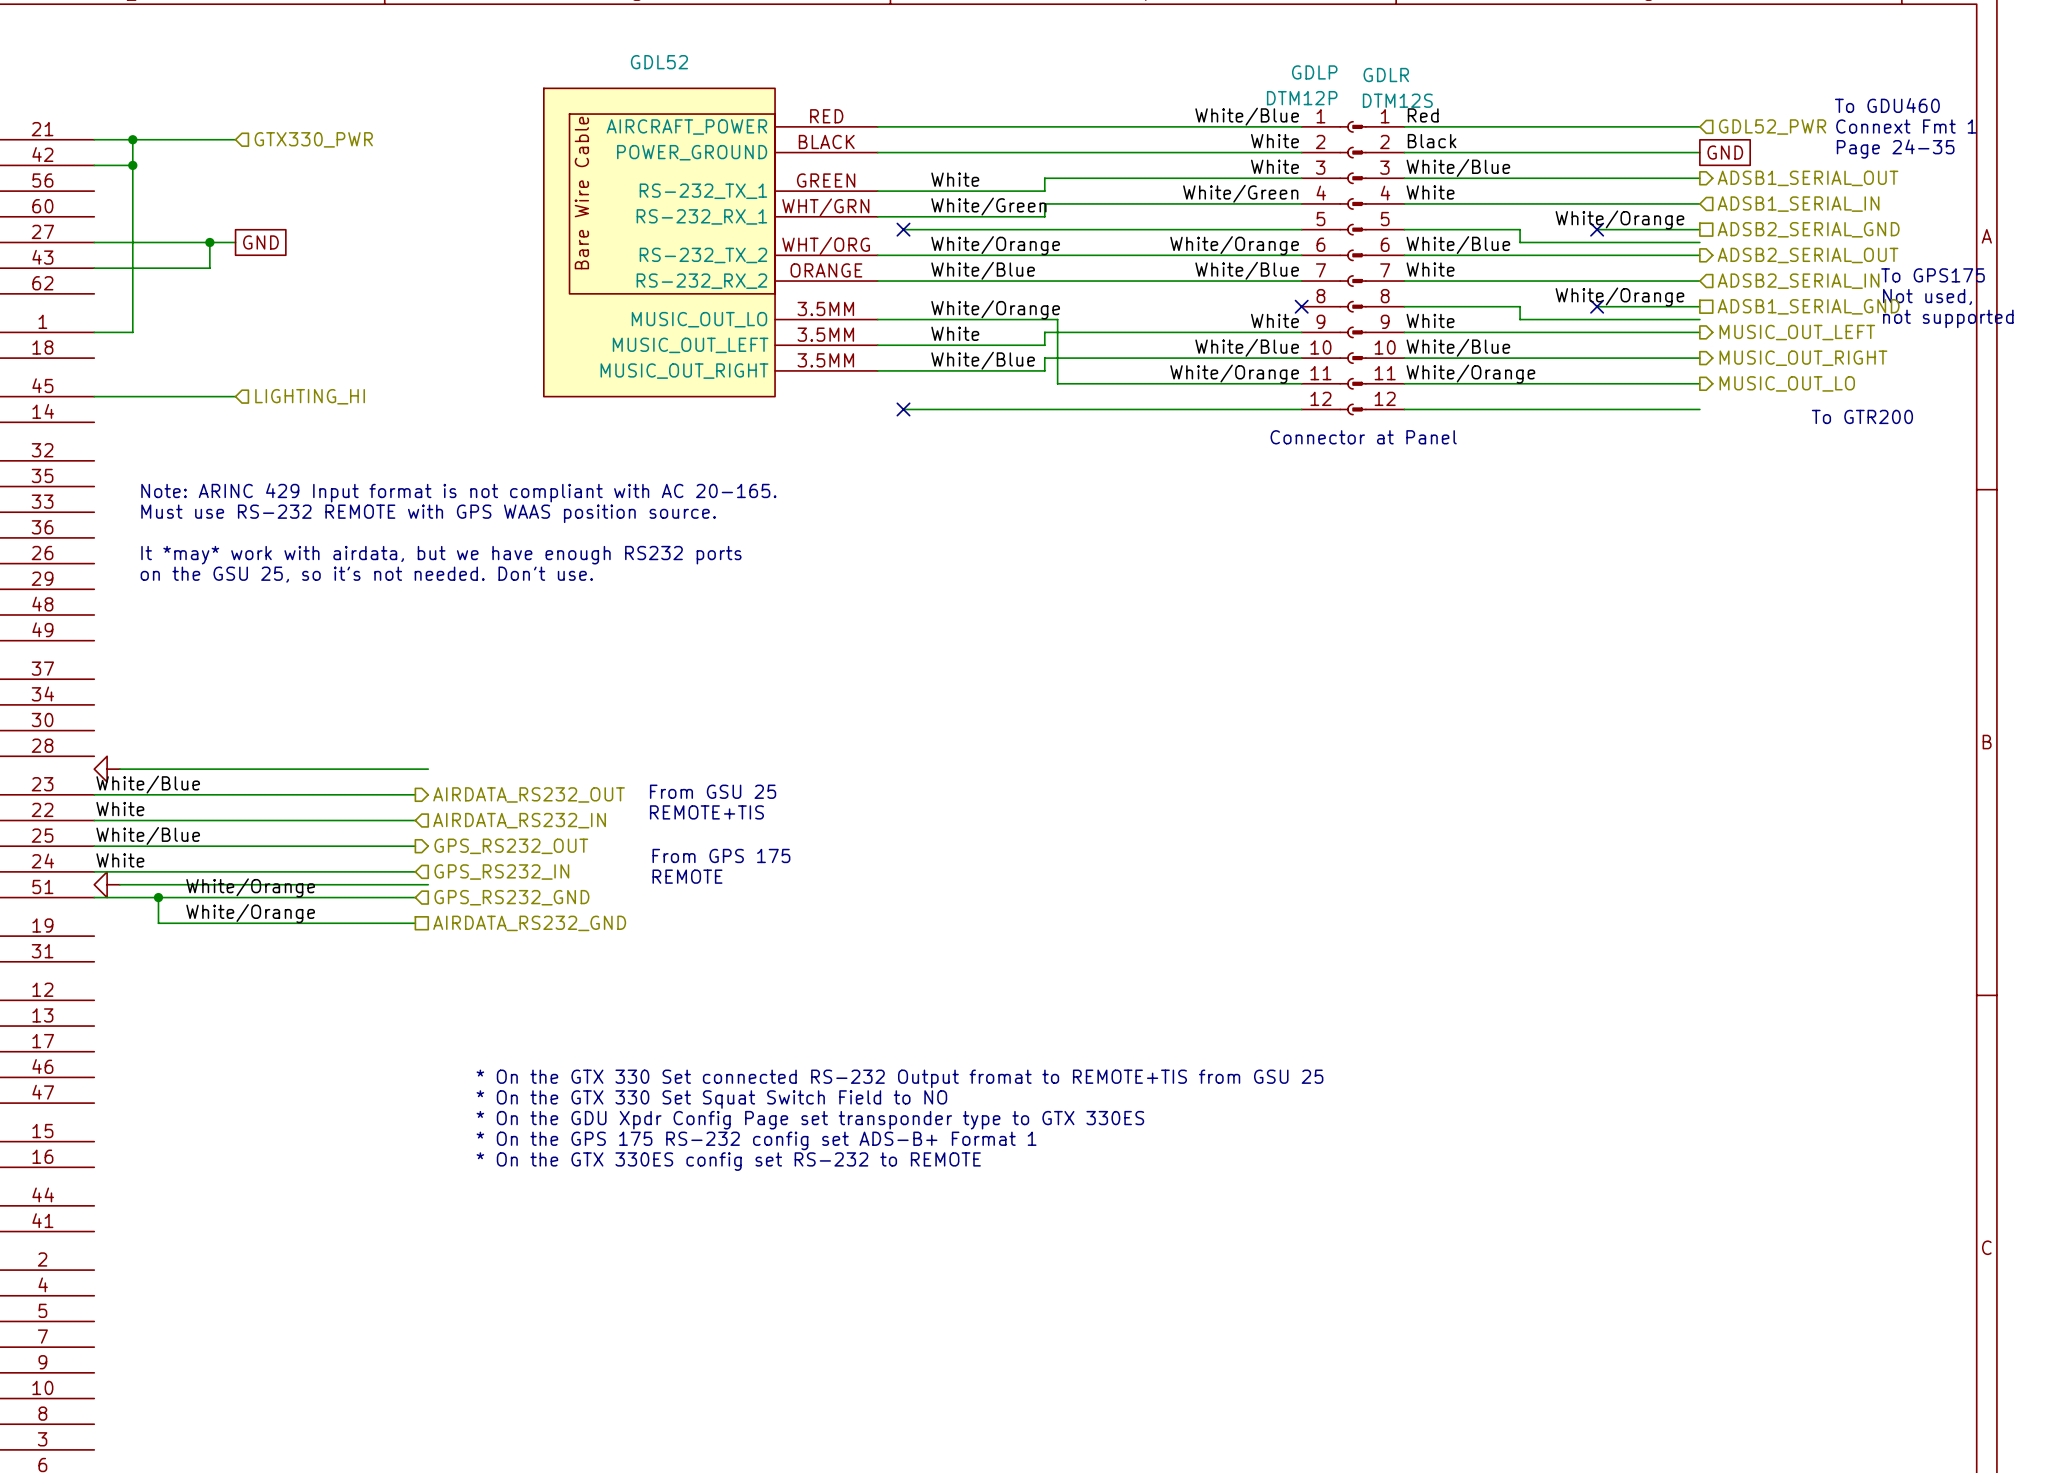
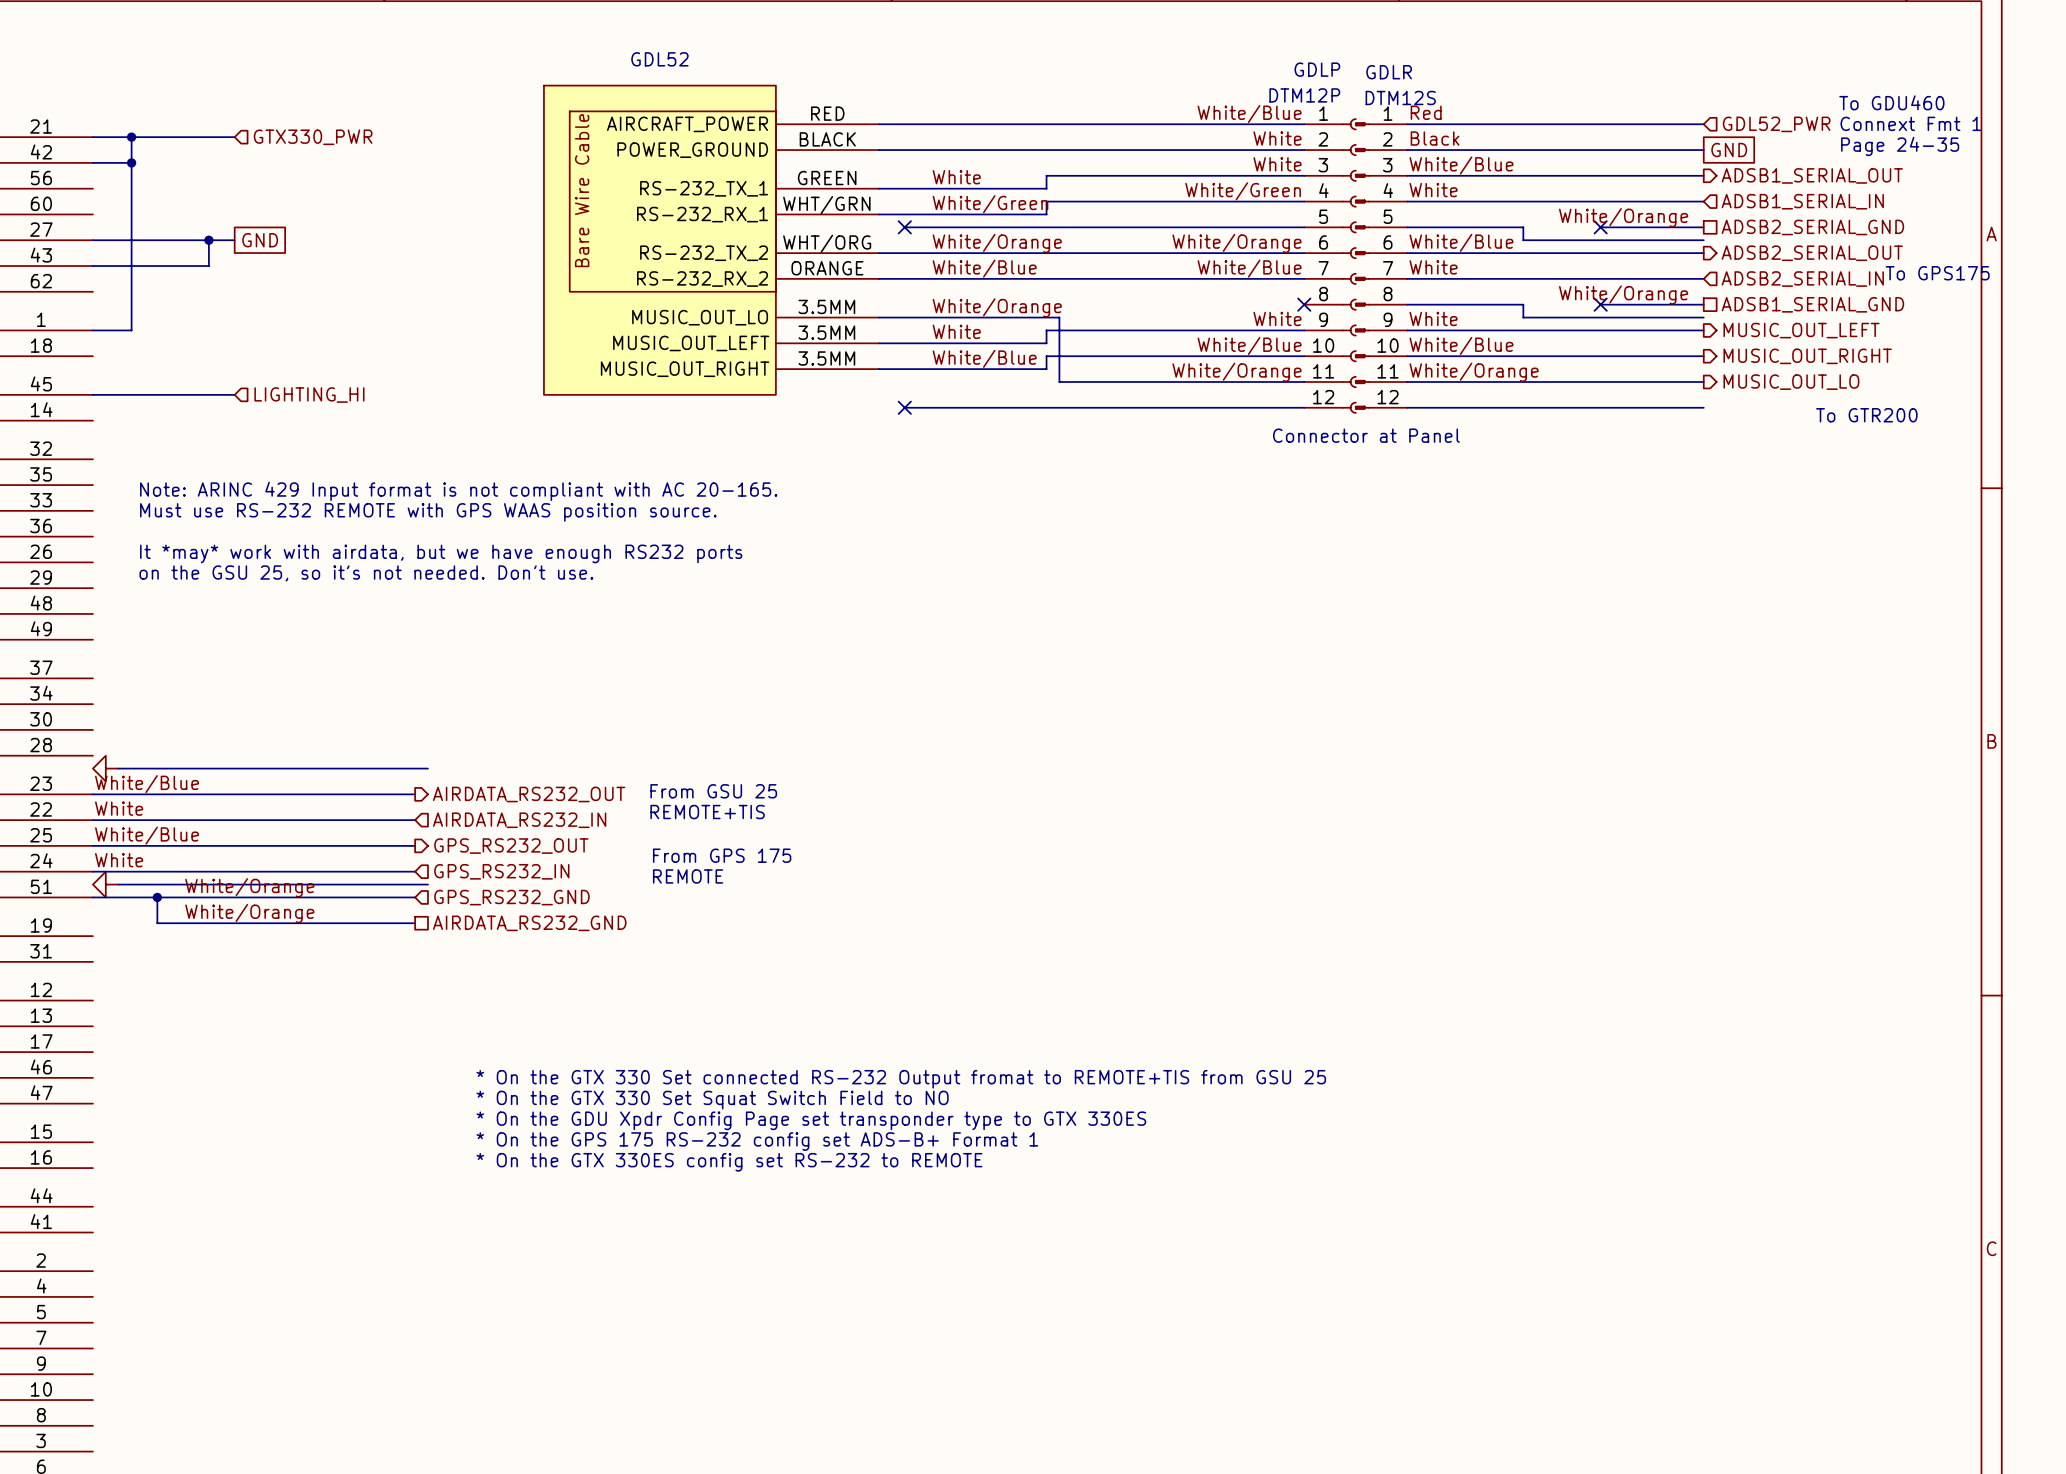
text: Not used, (1927, 296) -> none
text: not supported (1948, 318) -> none

